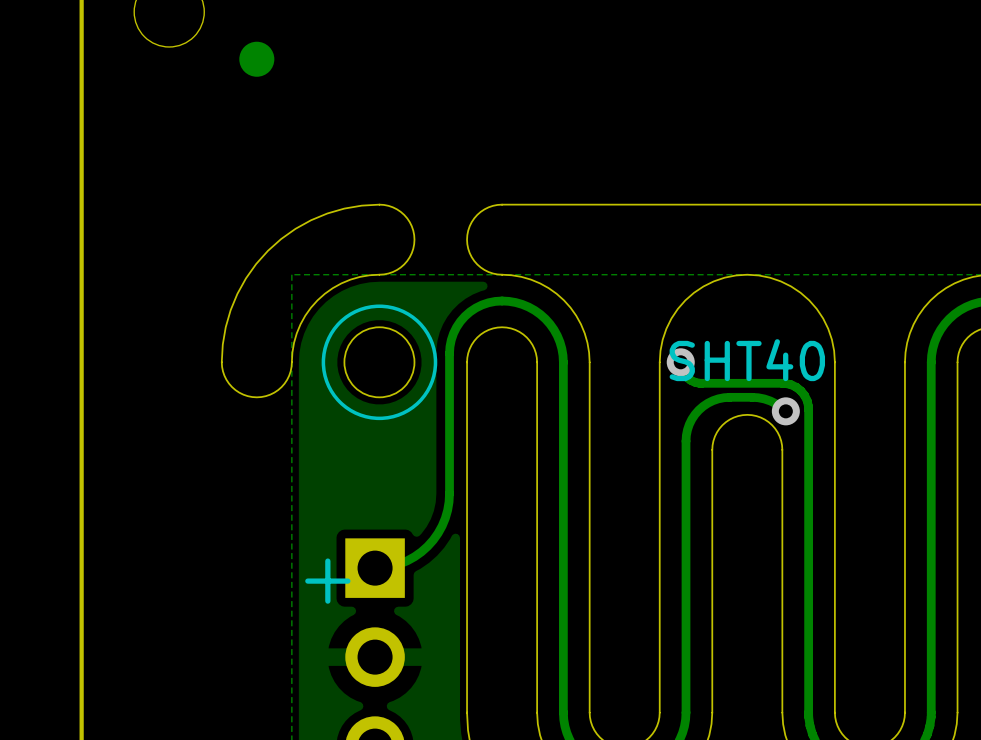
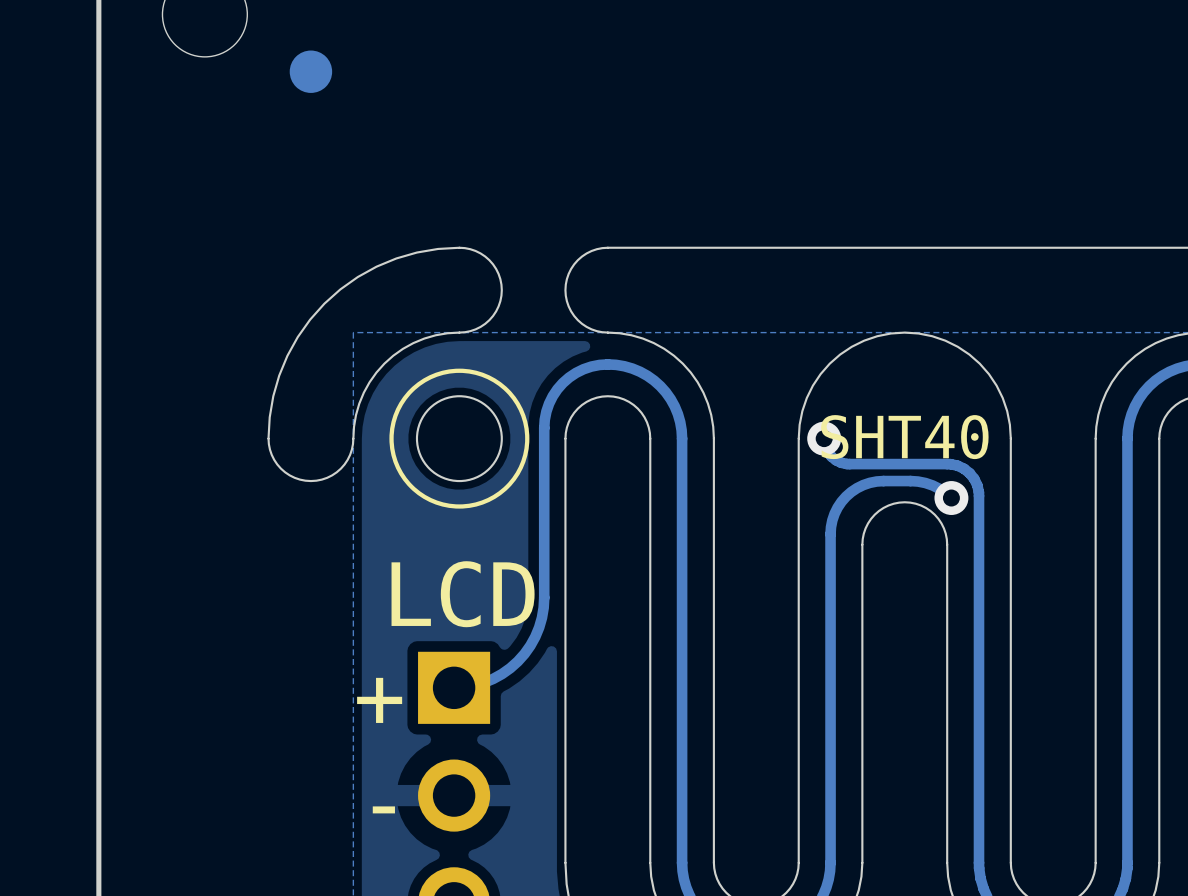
text: none -> LCD (463, 594)
text: none -> - (383, 809)

